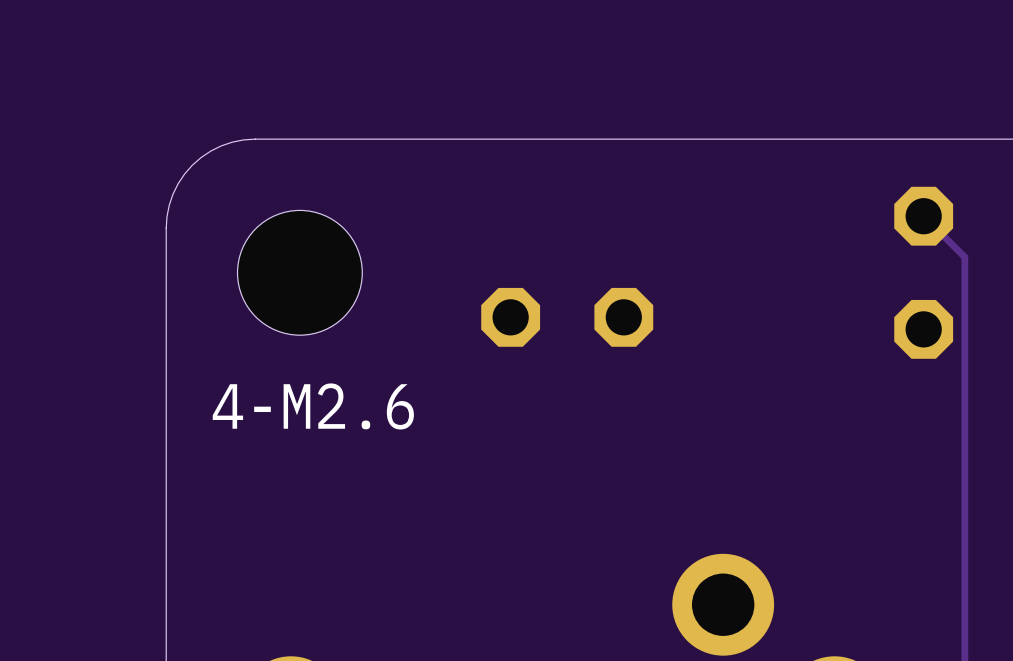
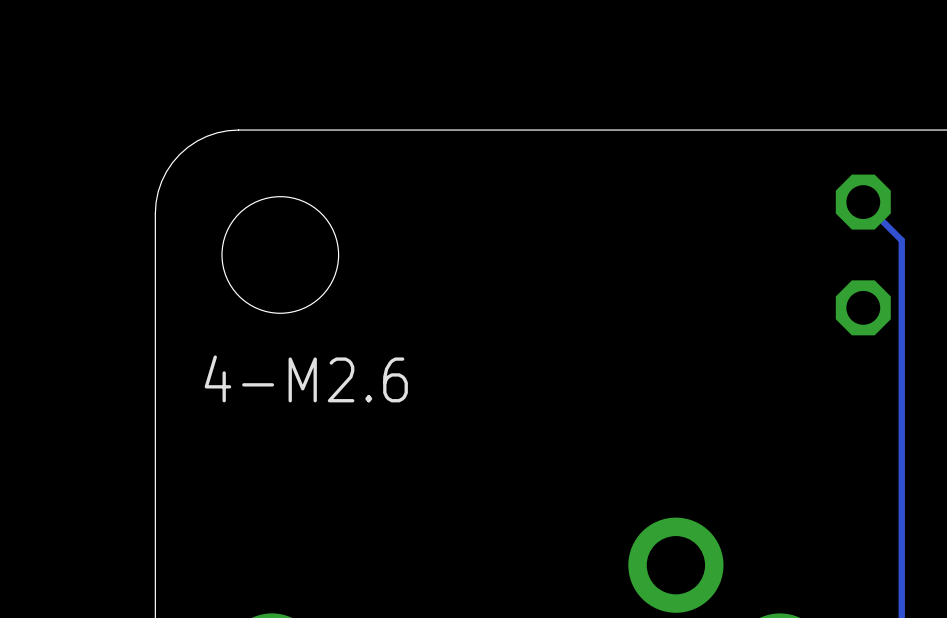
part: (567, 317) -> none

